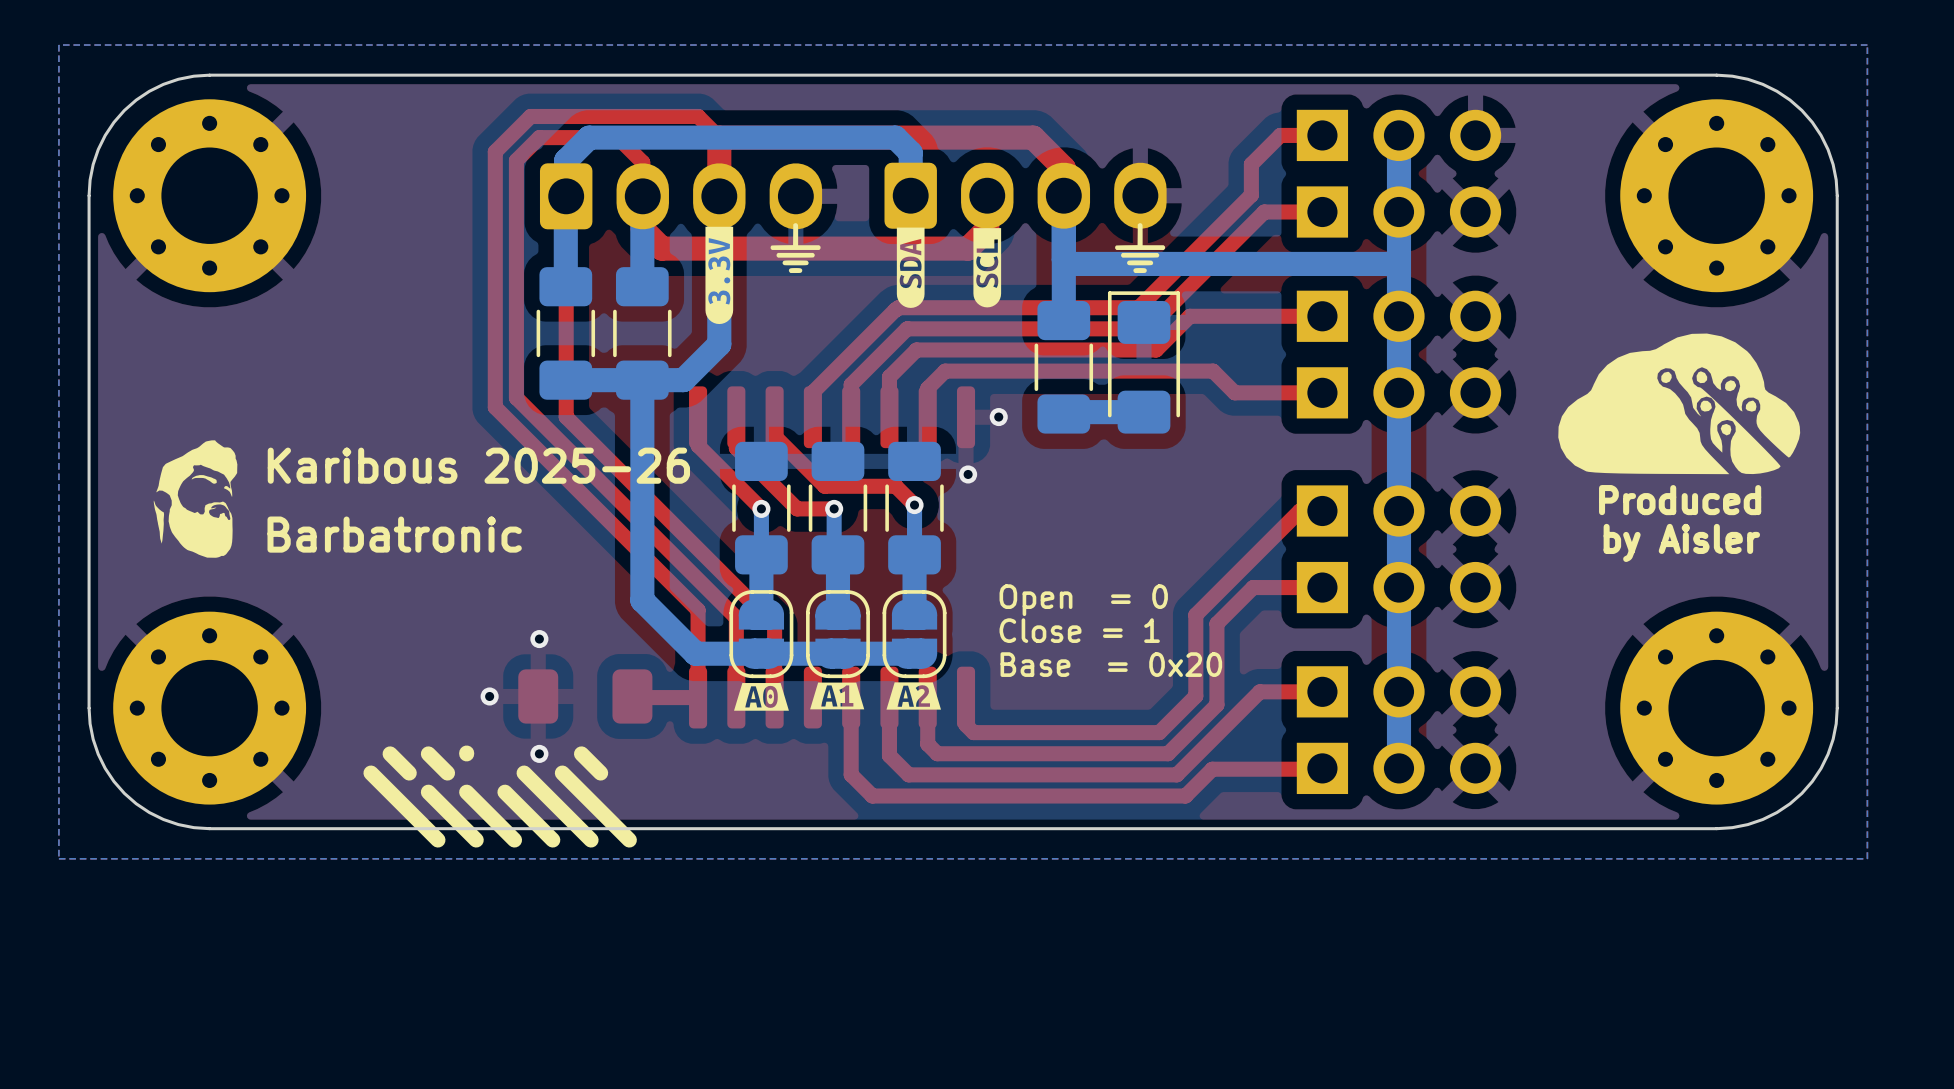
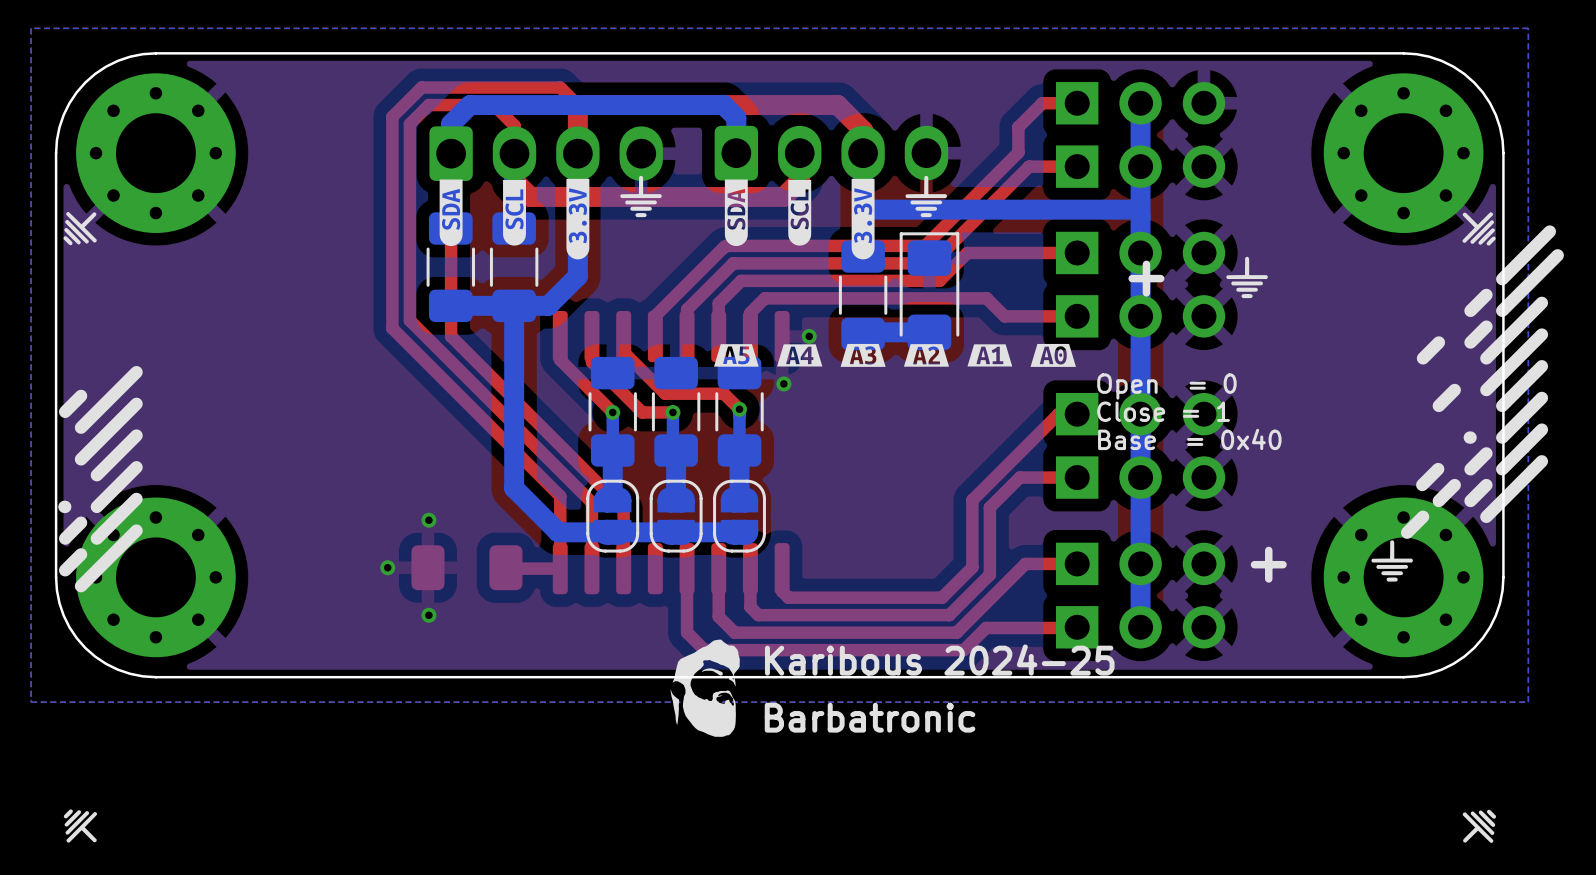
drawing: none -> [851, 178, 875, 260]
drawing: none -> [439, 179, 463, 247]
drawing: none -> [503, 179, 526, 246]
drawing: none -> [63, 211, 97, 246]
drawing: none -> [1462, 212, 1496, 246]
line: none -> (1549, 231) (1502, 279)
line: none -> (1557, 255) (1502, 310)
drawing: none -> [1226, 256, 1268, 299]
drawing: [1558, 333, 1801, 475] -> none
text: none -> + (1146, 278)
line: none -> (1486, 294) (1470, 310)
line: none -> (1541, 302) (1486, 358)
line: none -> (1486, 326) (1470, 342)
line: none -> (1541, 334) (1486, 390)
line: none -> (1438, 342) (1423, 358)
drawing: none -> [713, 343, 886, 367]
drawing: [153, 440, 238, 558] -> none
line: none -> (1541, 366) (1502, 405)
line: none -> (136, 372) (81, 427)
text: Karibous 2025-26 (478, 465) -> none
line: none -> (1454, 390) (1438, 405)
line: none -> (81, 395) (65, 411)
line: none -> (1541, 397) (1502, 437)
line: none -> (136, 403) (81, 459)
text: Produced (1680, 500) -> none
line: none -> (1541, 429) (1502, 469)
text: Barbatronic (394, 534) -> none
line: none -> (136, 435) (96, 475)
line: none -> (1470, 437) (1469, 437)
text: none -> Base = 0x40 (1189, 439)
text: by Aisler (1681, 542) -> none
line: none -> (1486, 453) (1470, 469)
line: none -> (1541, 461) (1486, 516)
line: none -> (136, 467) (96, 506)
line: none -> (1438, 469) (1422, 484)
line: none -> (1454, 485) (1438, 500)
line: none -> (1486, 485) (1470, 500)
text position: Open = 0 (1083, 600) -> Open = 0 (1166, 386)
line: none -> (136, 498) (96, 538)
line: none -> (65, 506) (64, 506)
text position: Close = 1 (1079, 630) -> Close = 1 (1163, 411)
line: none -> (1423, 516) (1407, 532)
line: none -> (81, 522) (65, 538)
line: none -> (136, 530) (81, 586)
drawing: none -> [1371, 540, 1413, 582]
text: Base = 0x20 (1111, 664) -> none
line: none -> (81, 554) (65, 570)
text: none -> + (1268, 564)
drawing position: (837, 695) -> (989, 355)
drawing position: (913, 695) -> (926, 355)
drawing position: (761, 696) -> (1053, 355)
line: (390, 753) (409, 773) -> none
line: (428, 753) (447, 773) -> none
line: (466, 753) (466, 753) -> none
line: (581, 753) (600, 773) -> none
line: (370, 773) (437, 840) -> none
line: (524, 773) (591, 840) -> none
line: (562, 773) (629, 840) -> none
drawing: none -> [670, 639, 740, 737]
line: (428, 792) (476, 840) -> none
line: (466, 792) (514, 840) -> none
line: (504, 792) (552, 840) -> none
text: none -> Karibous 2024-25 (939, 660)
text: none -> Barbatronic (870, 717)
drawing: none -> [63, 809, 98, 843]
drawing: none -> [1462, 809, 1496, 843]

